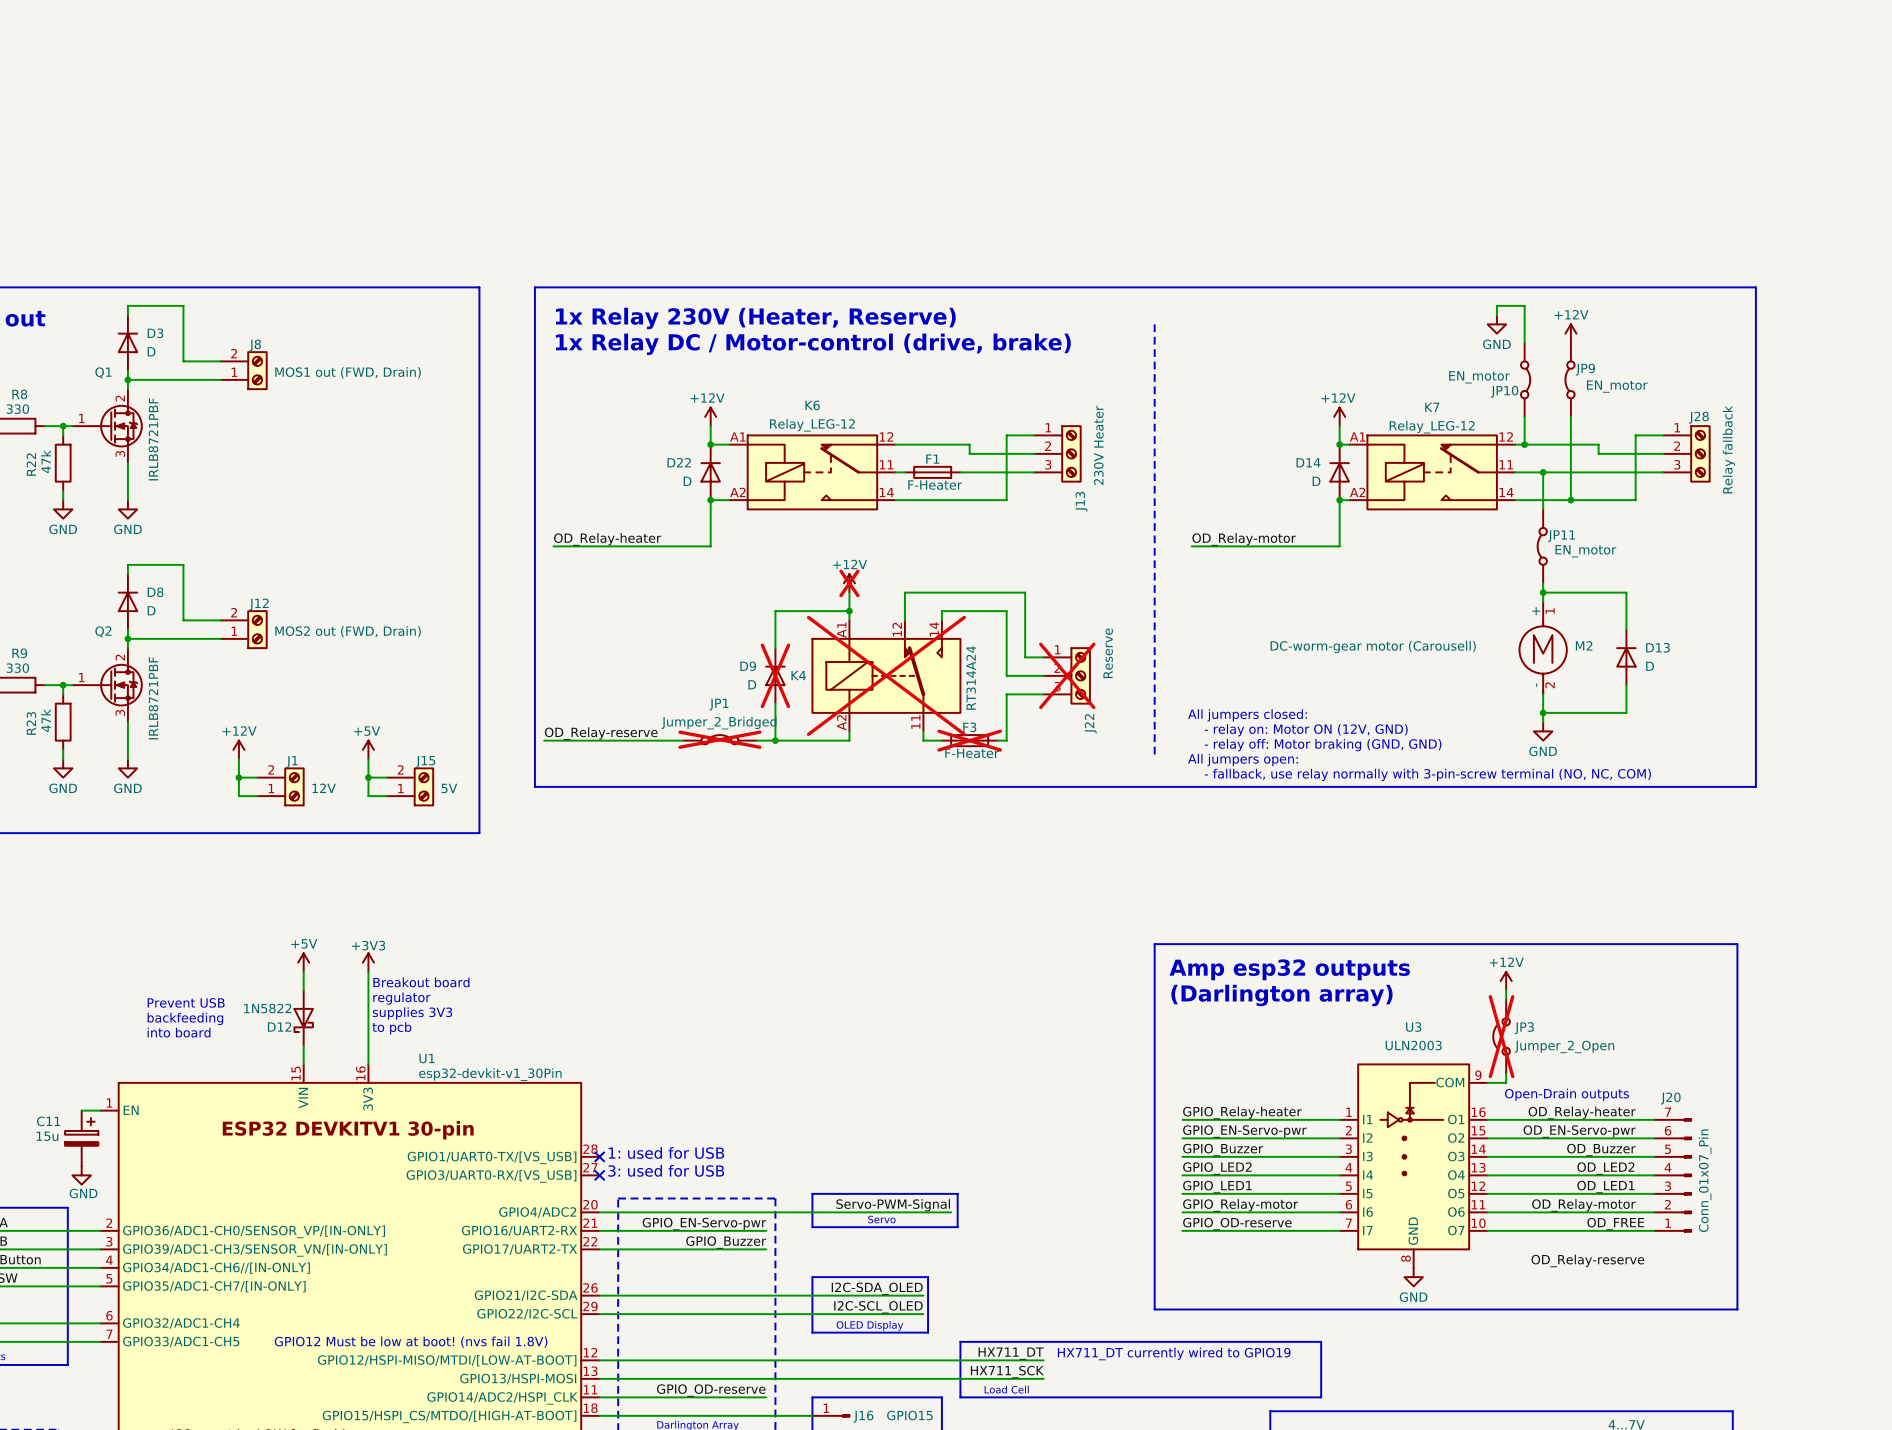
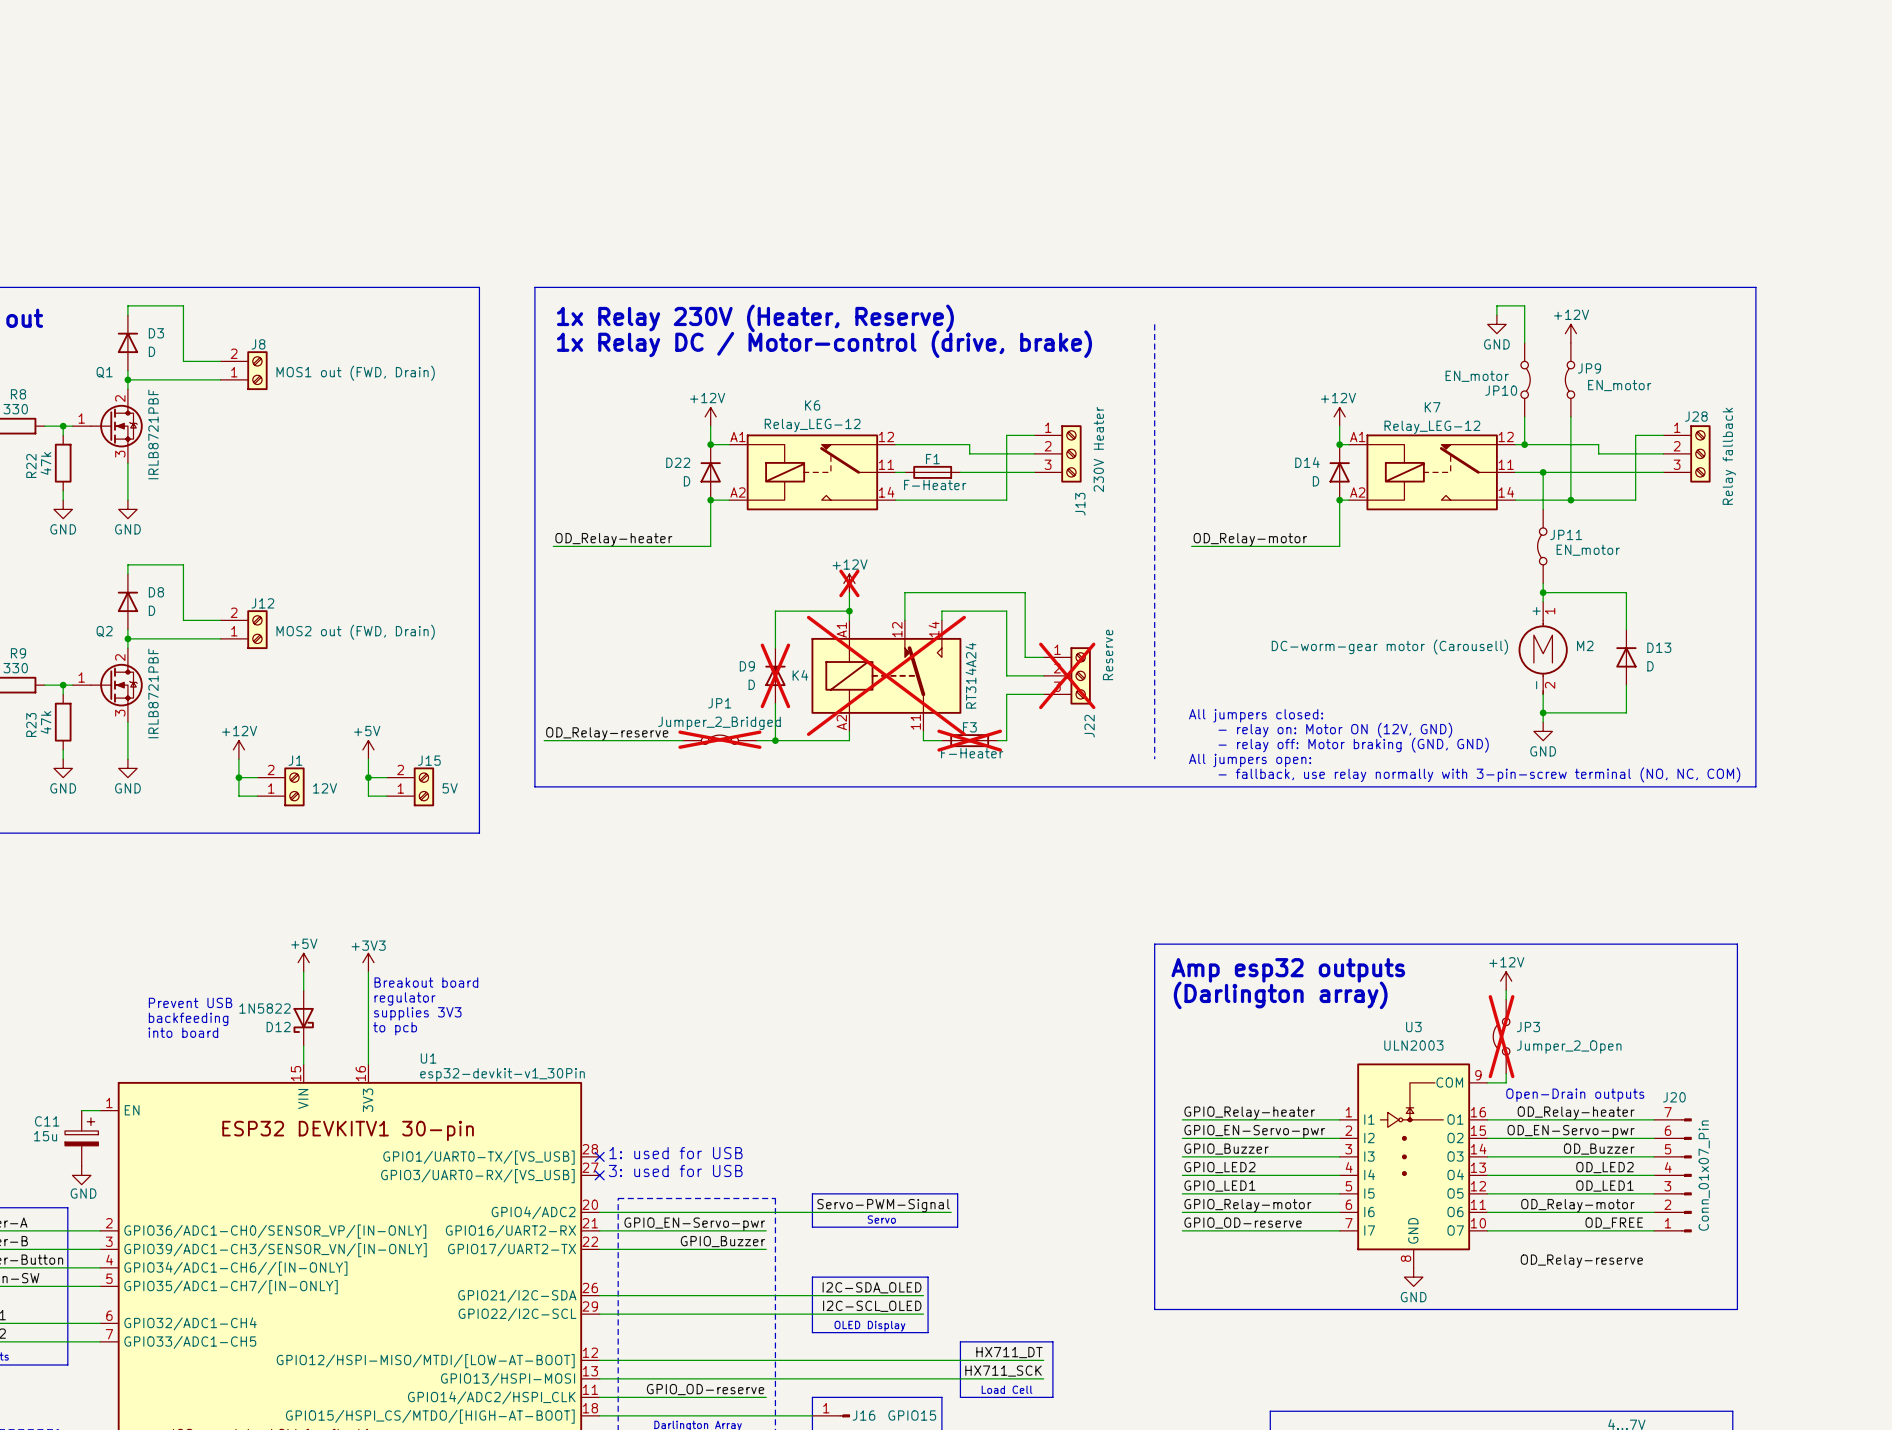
line: (1052, 1341) (1321, 1341) (1321, 1397) (1052, 1397) -> (1052, 1341) (1052, 1397)
text: GPIO12 Must be low at boot! (nvs fail 1.8V) (411, 1342) -> none
text: HX711_DT currently wired to GPIO19 (1174, 1353) -> none

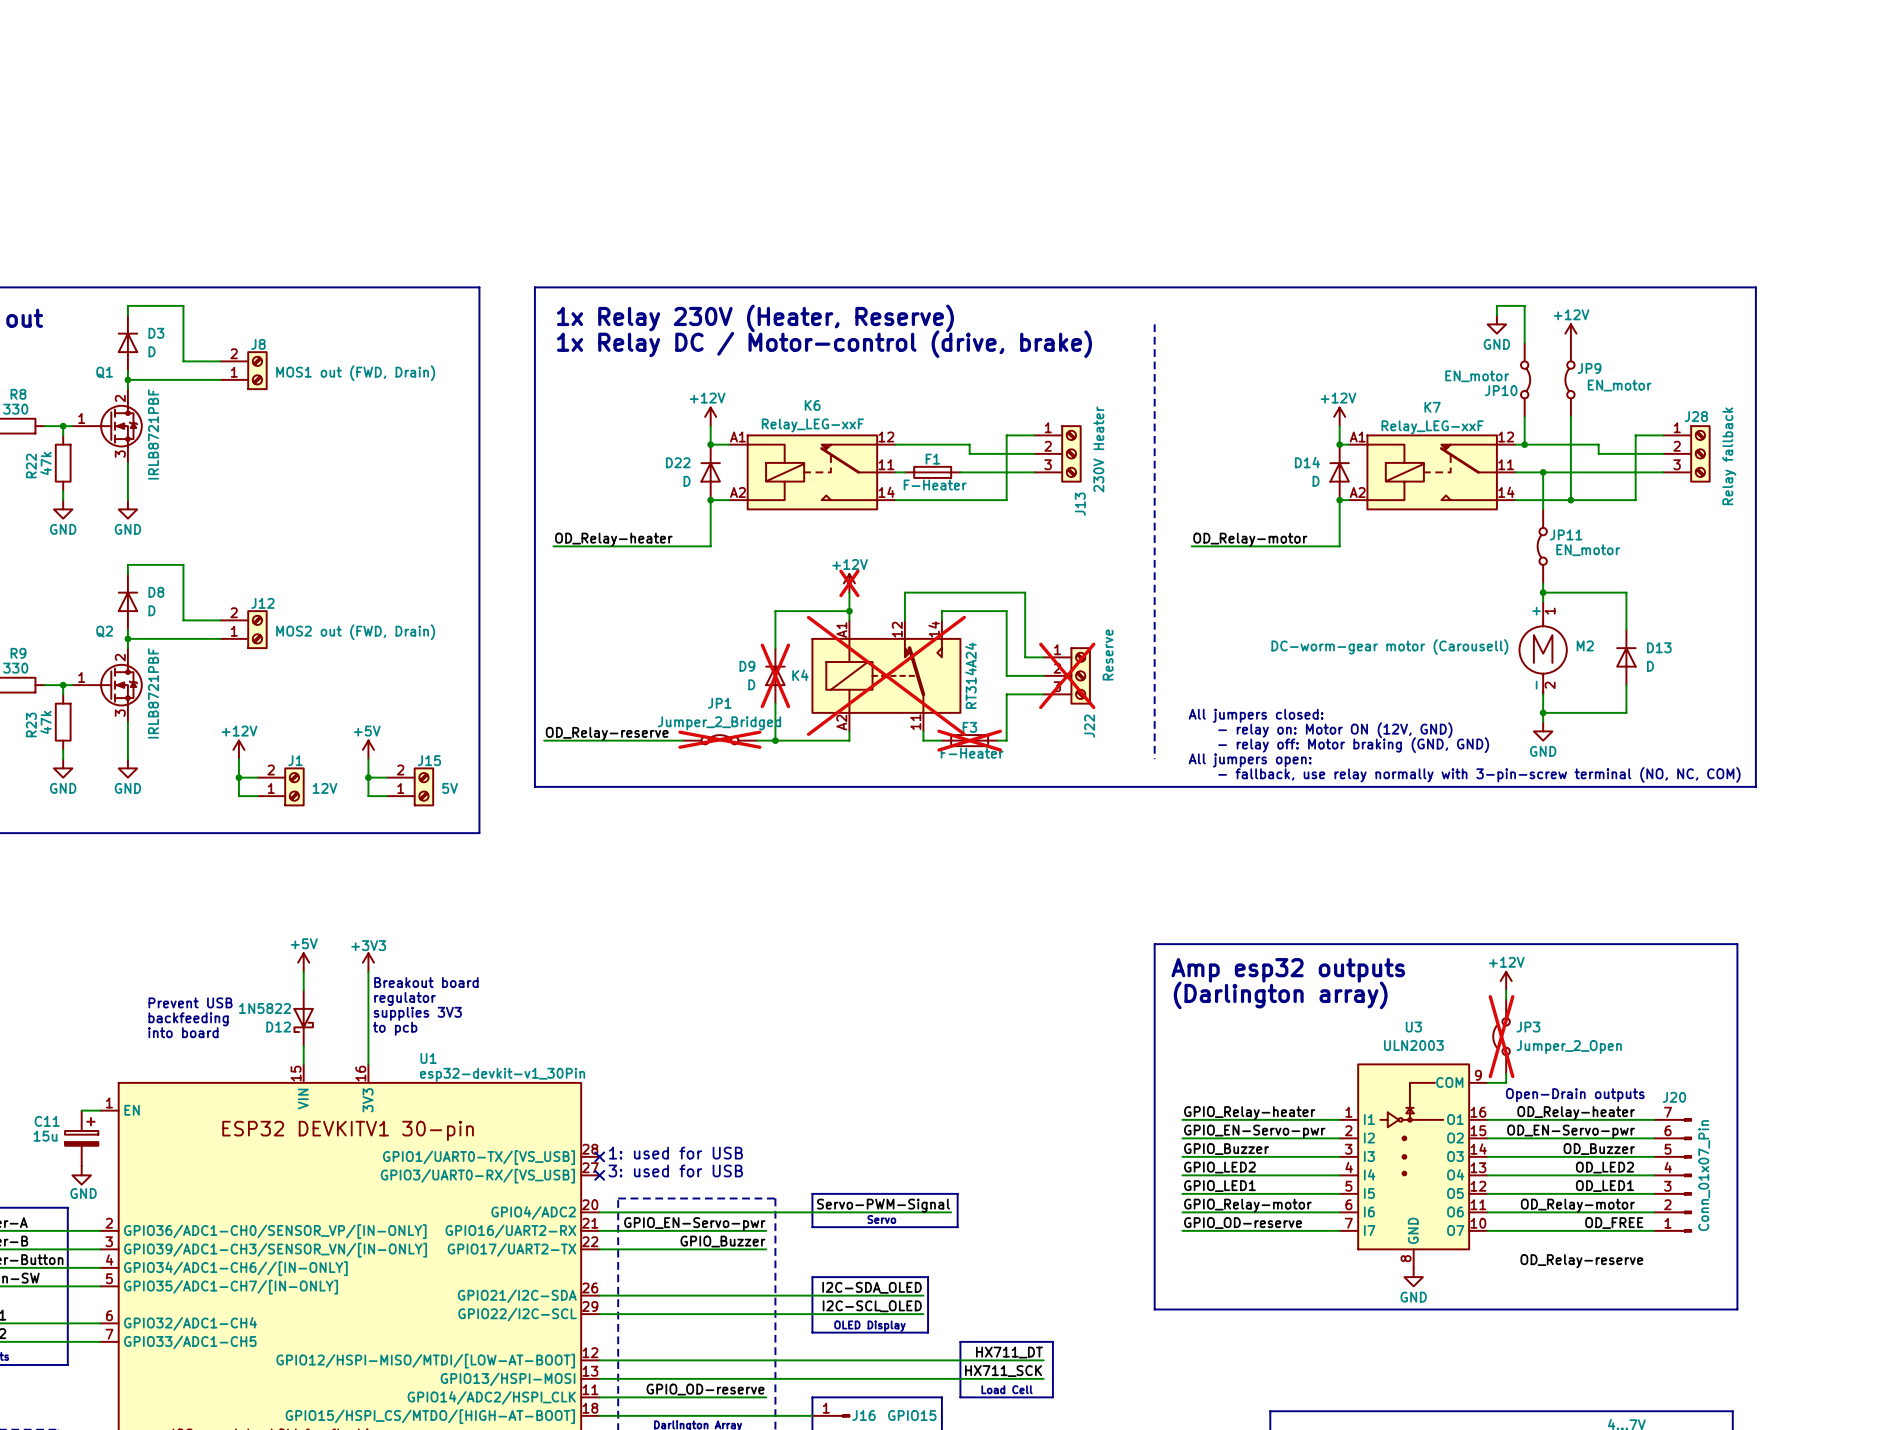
K6 value: Relay_LEG-12 (812, 425) -> Relay_LEG-xxF (812, 425)
K7 value: Relay_LEG-12 (1432, 427) -> Relay_LEG-xxF (1432, 427)

